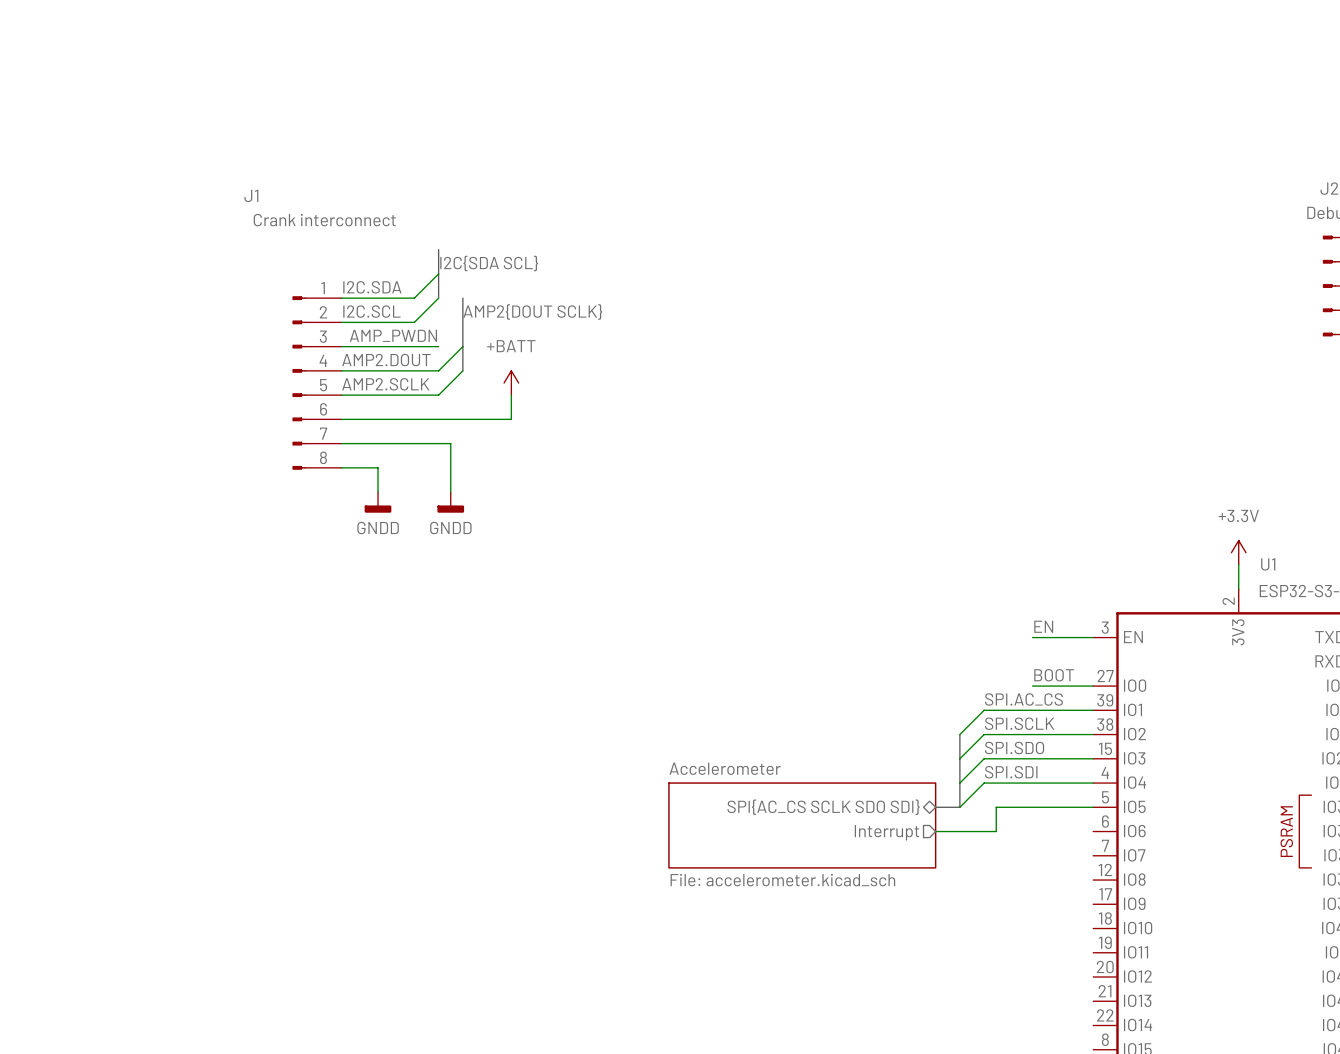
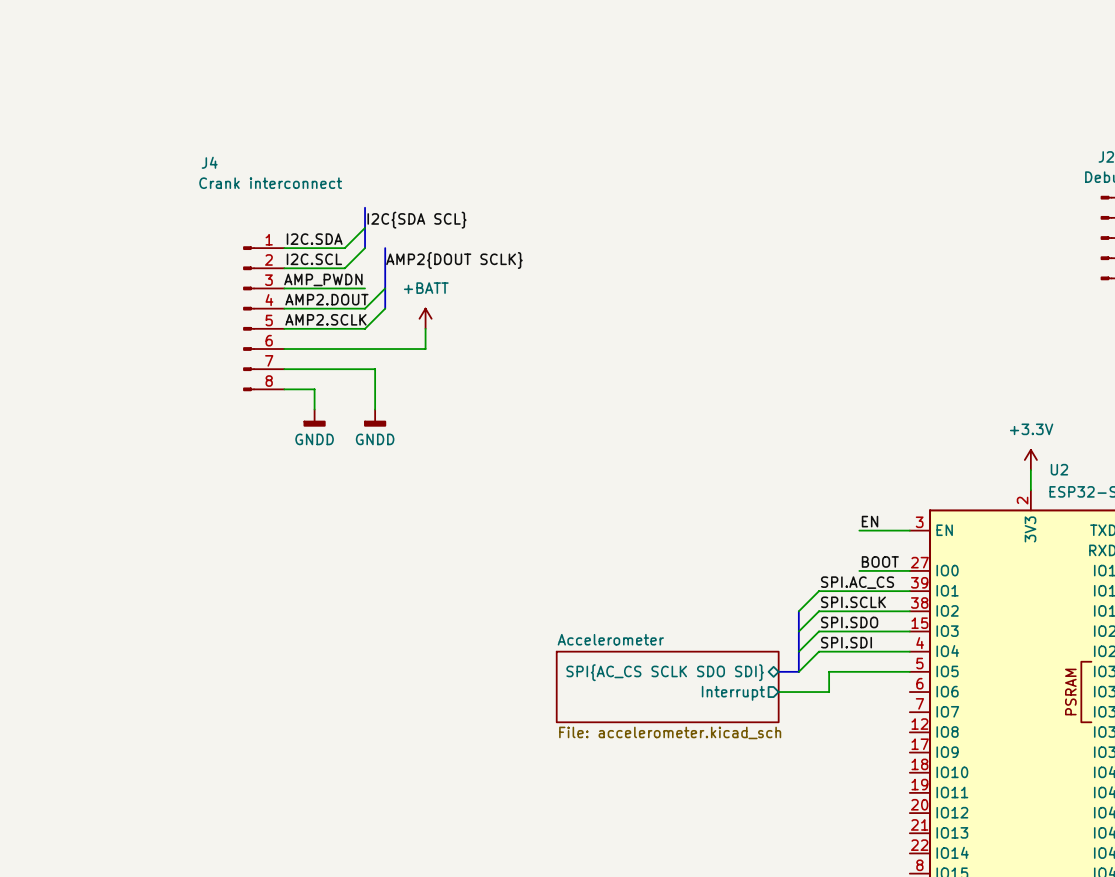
J1 name: J1 (251, 195) -> J4 (209, 162)
U1 name: U1 (1268, 564) -> U2 (1059, 469)

